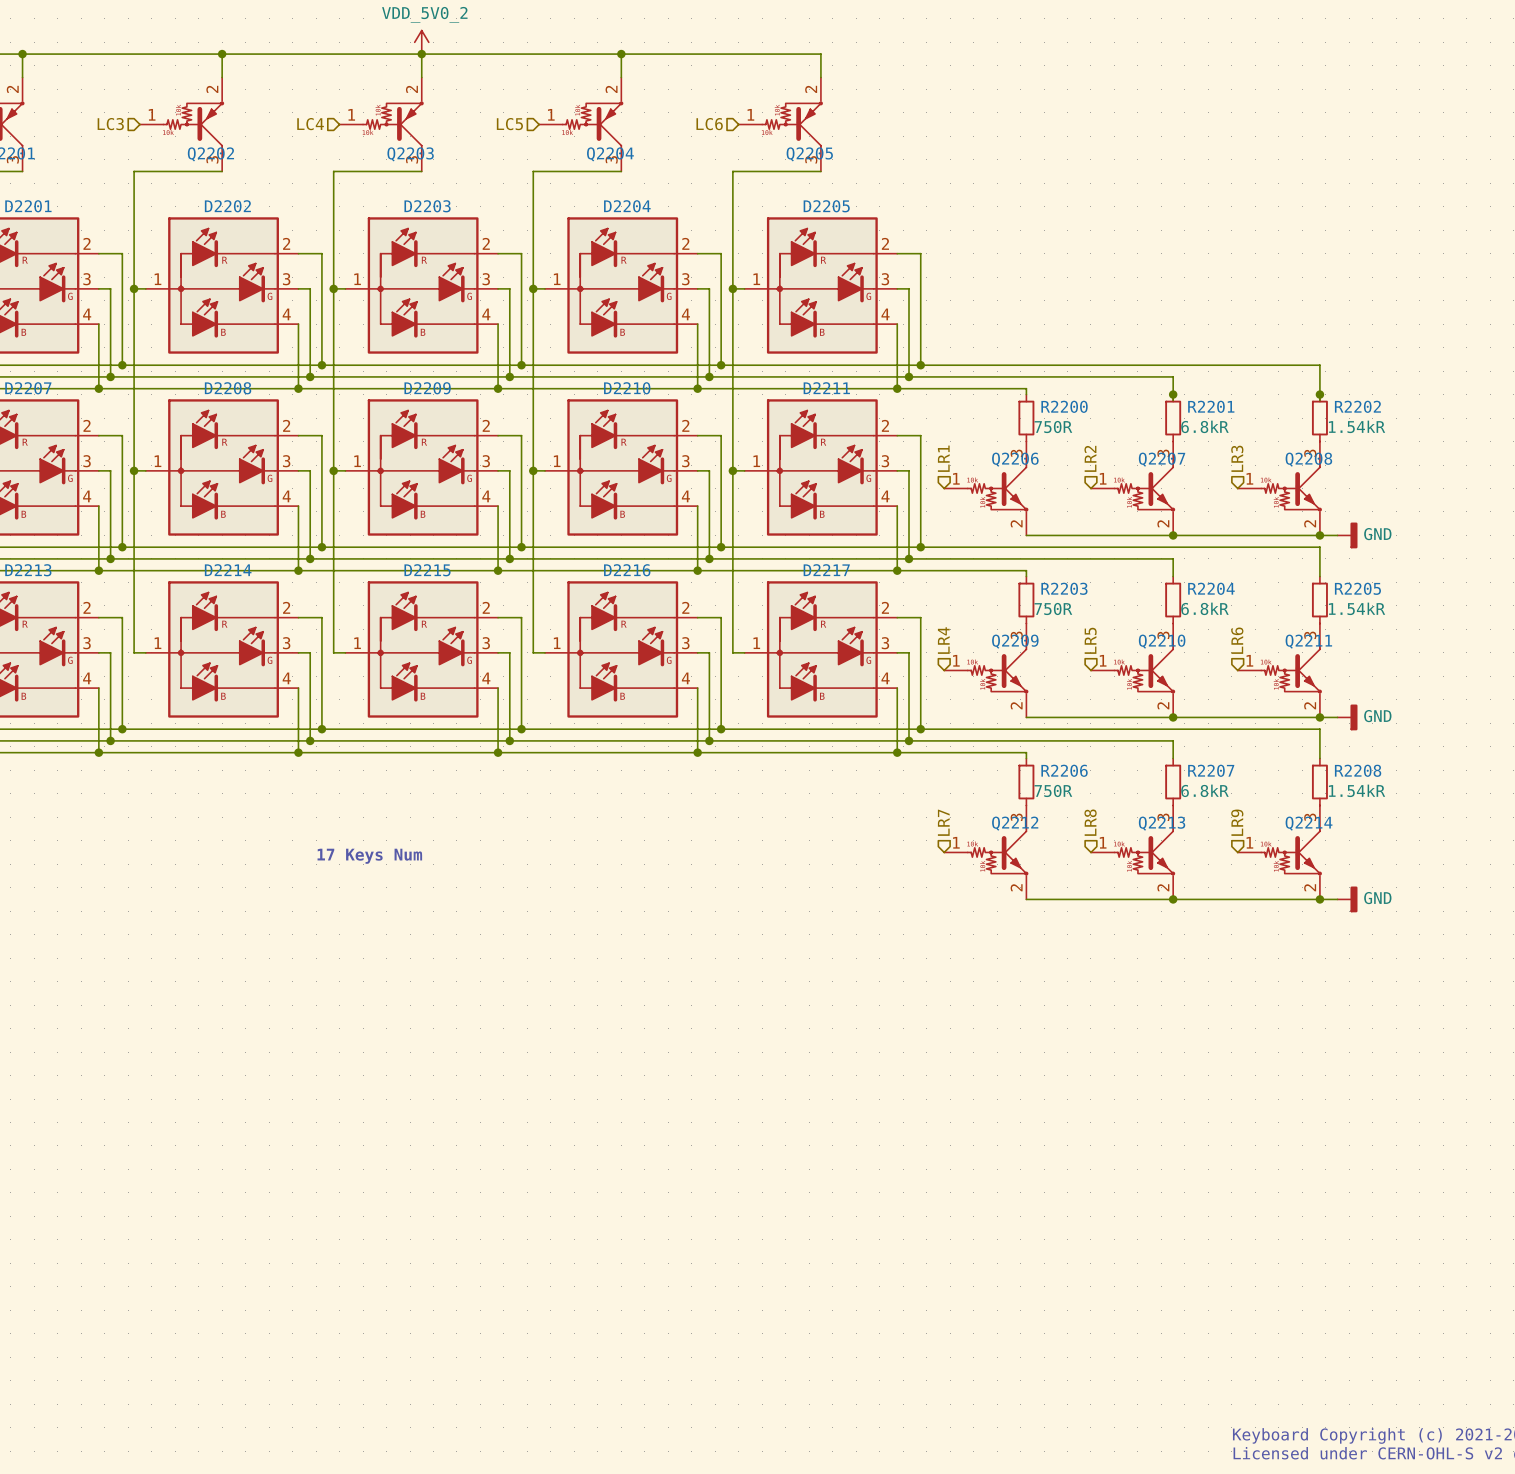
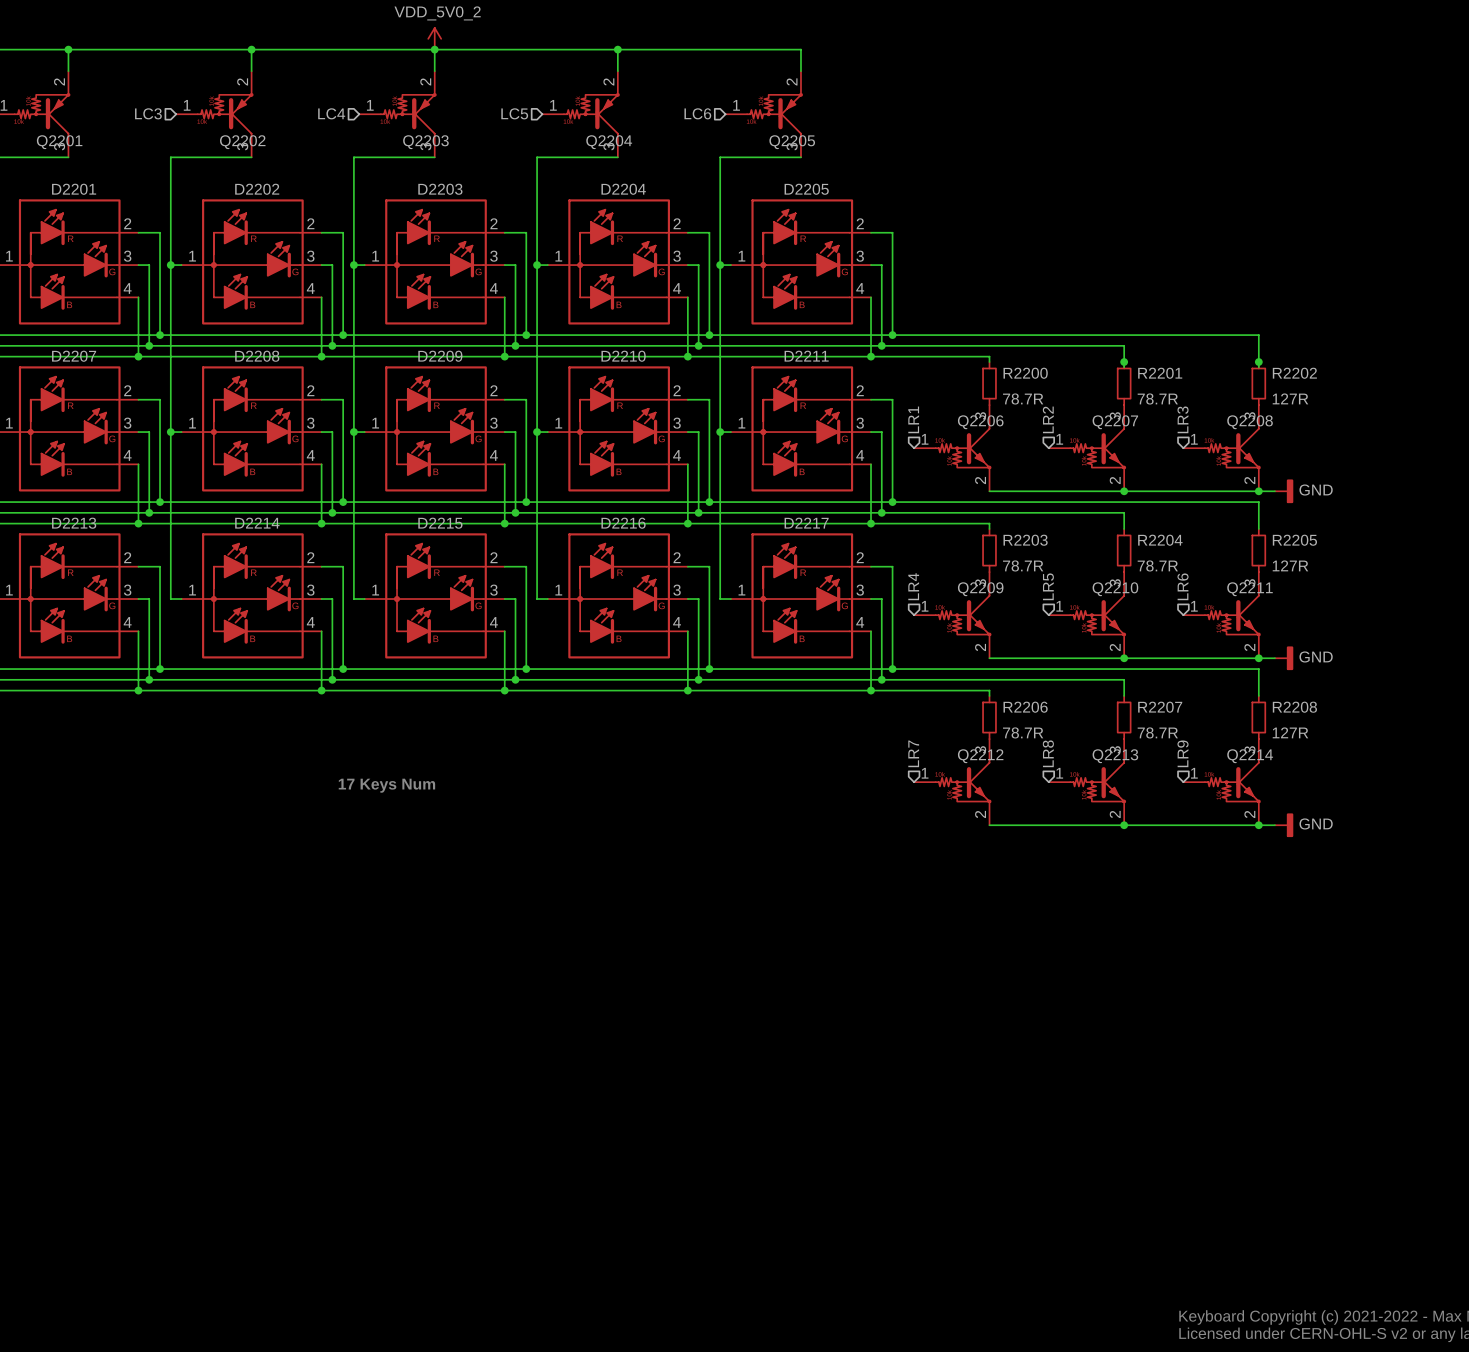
R2201 value: 6.8kR (1204, 426) -> 78.7R (1157, 398)
R2202 value: 1.54kR (1357, 426) -> 127R (1290, 398)
R2200 value: 750R (1053, 427) -> 78.7R (1023, 398)
R2203 value: 750R (1053, 608) -> 78.7R (1023, 565)
R2204 value: 6.8kR (1204, 608) -> 78.7R (1157, 565)
R2205 value: 1.54kR (1357, 608) -> 127R (1290, 565)
R2206 value: 750R (1053, 790) -> 78.7R (1023, 732)
R2207 value: 6.8kR (1204, 790) -> 78.7R (1157, 732)
R2208 value: 1.54kR (1357, 790) -> 127R (1290, 732)

